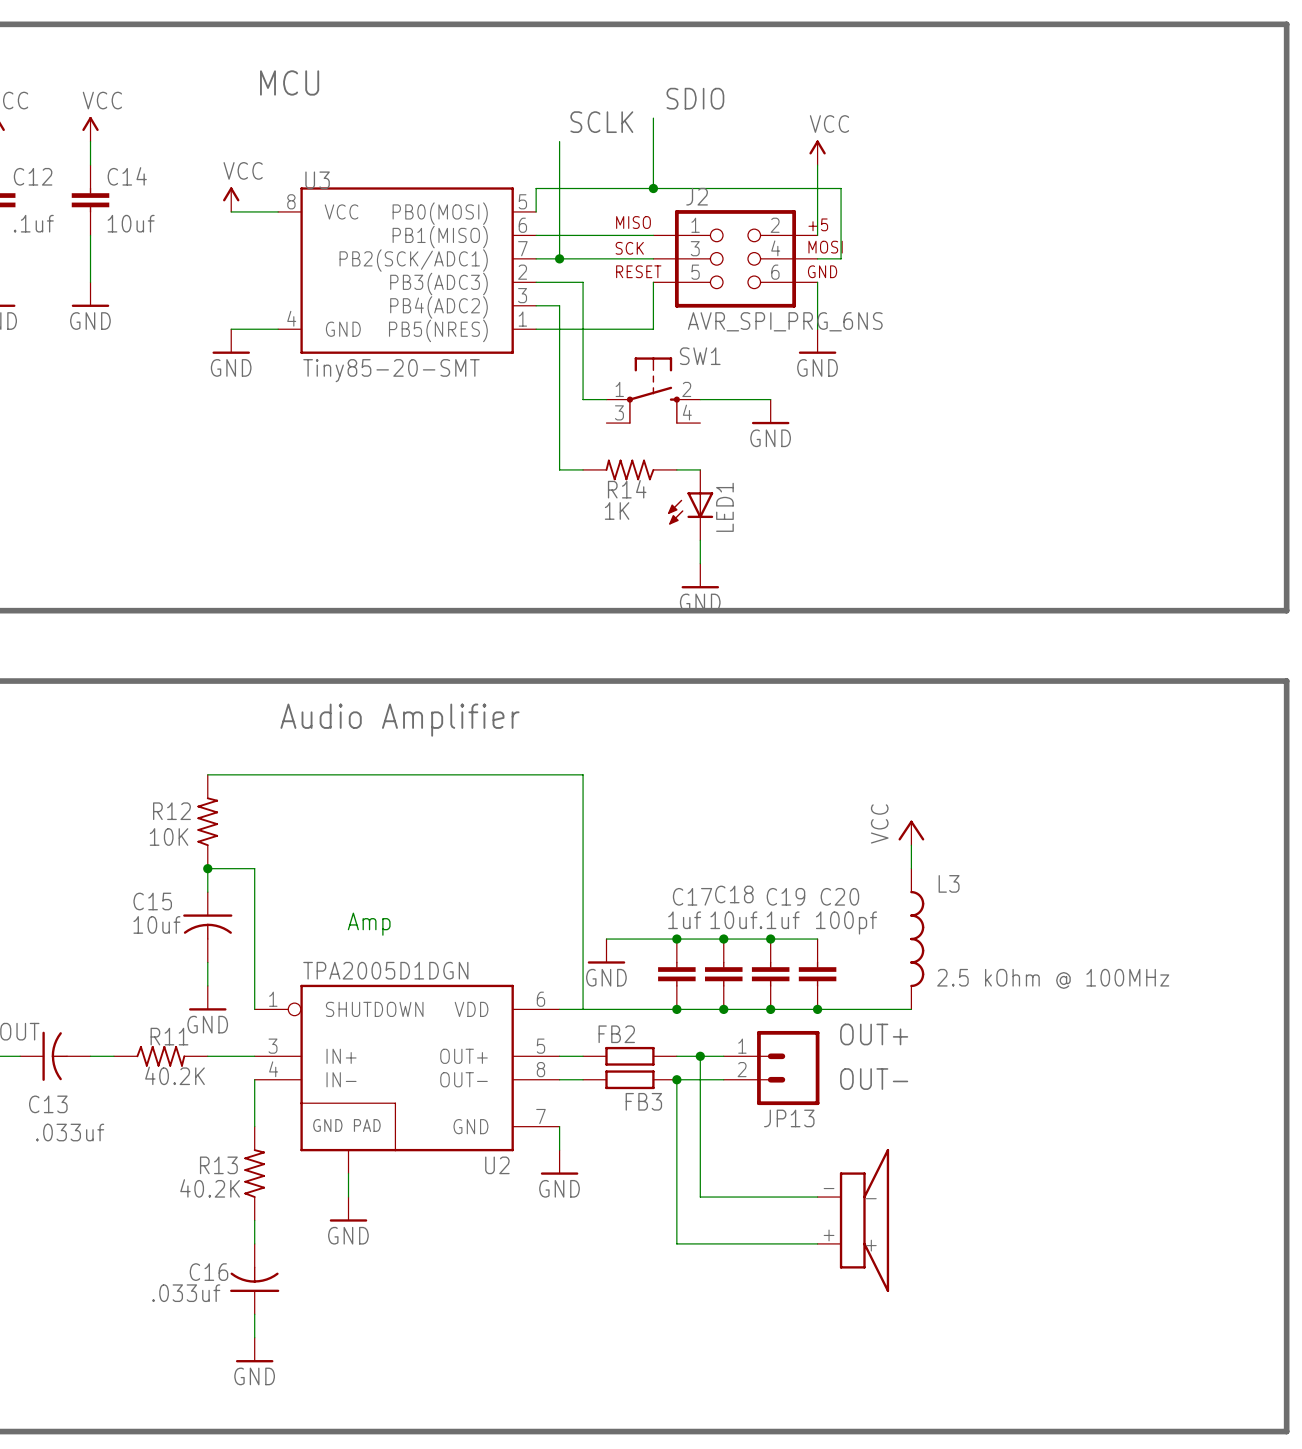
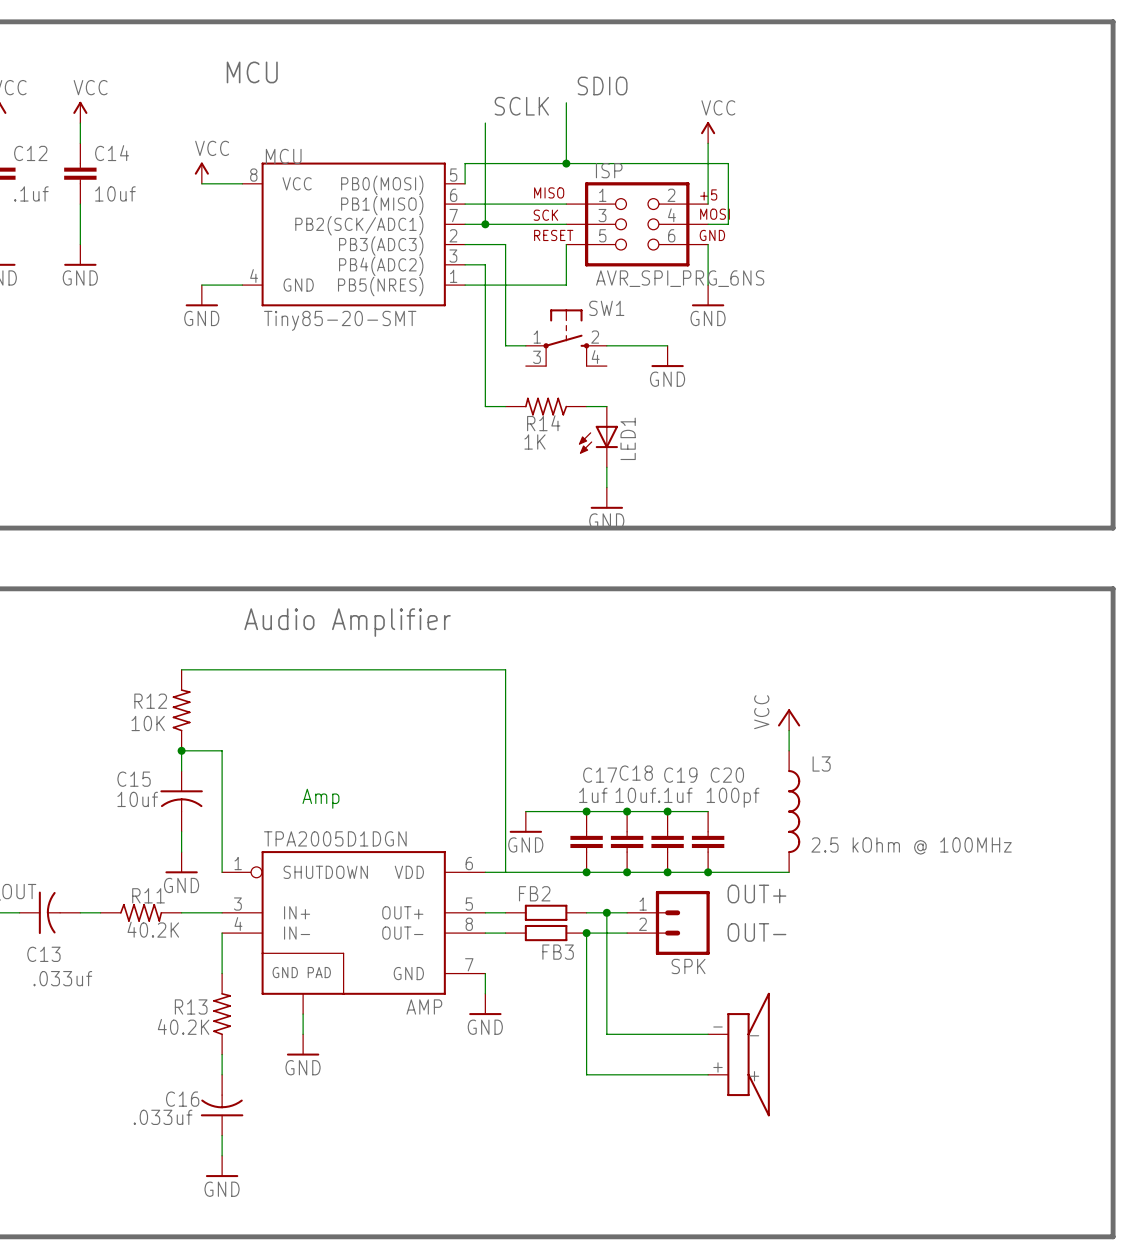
U3 name: U3 (317, 180) -> MCU (283, 156)
J2 name: J2 (697, 196) -> ISP (609, 170)
JP13 name: JP13 (789, 1118) -> SPK (688, 966)
U2 name: U2 (497, 1165) -> AMP (424, 1006)

